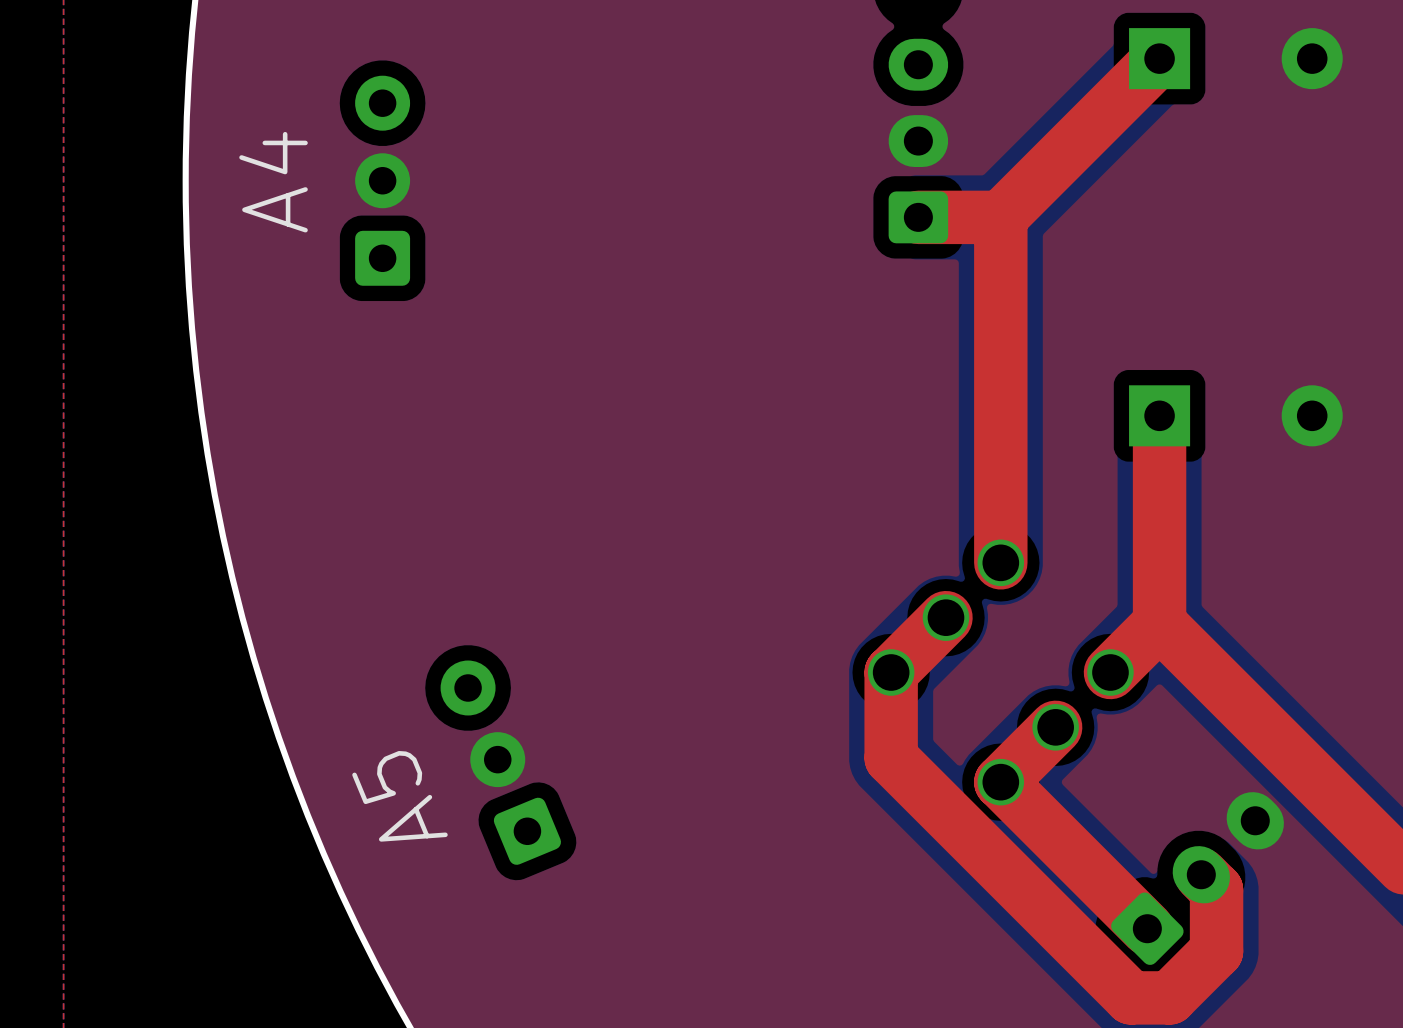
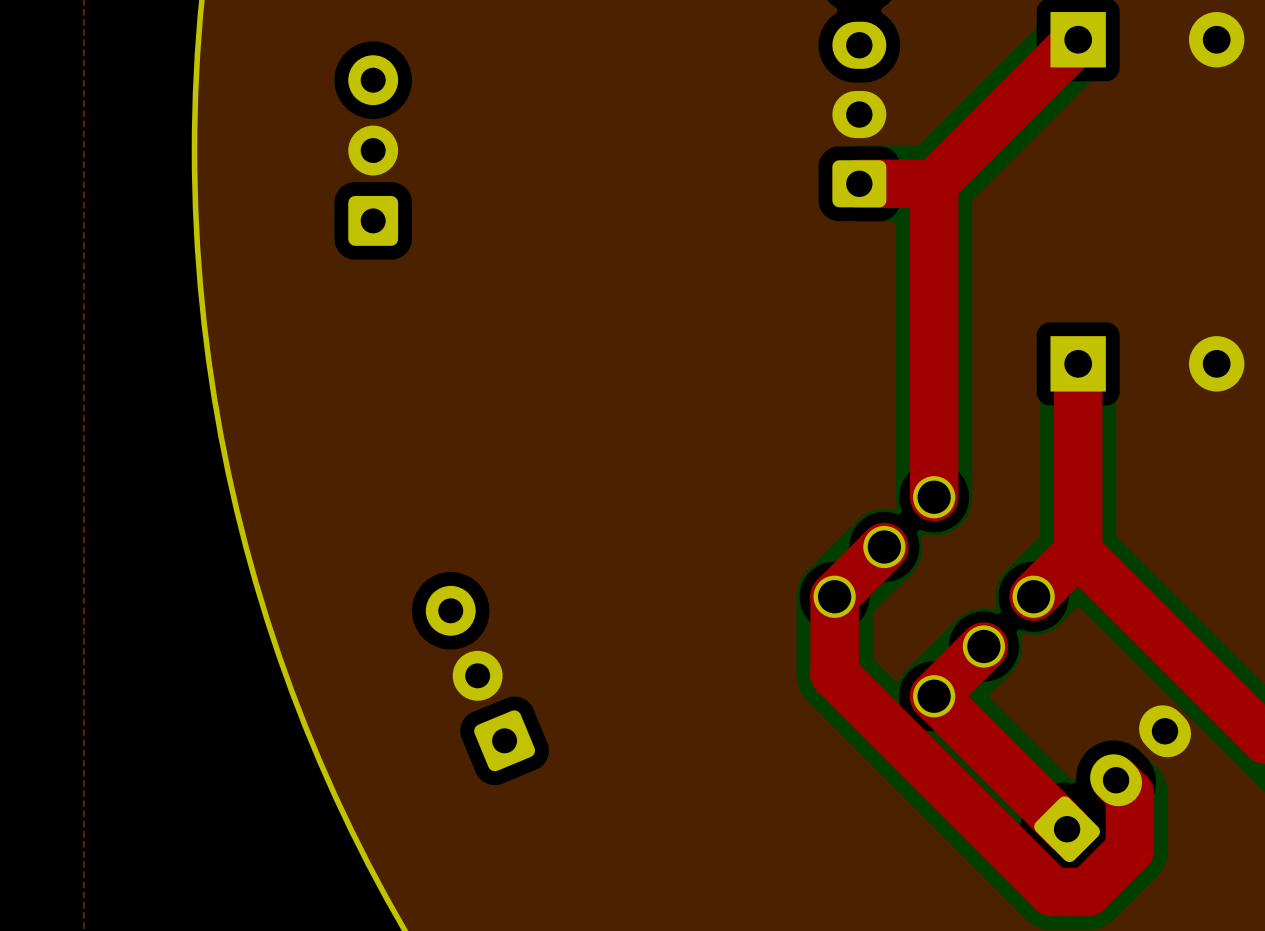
text: A4 (273, 182) -> none
text: A5 (400, 796) -> none

